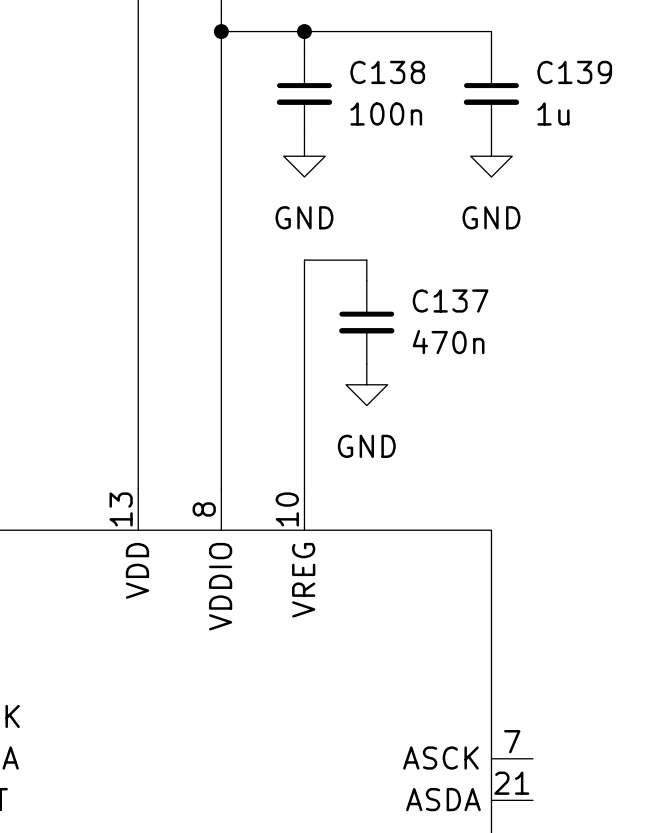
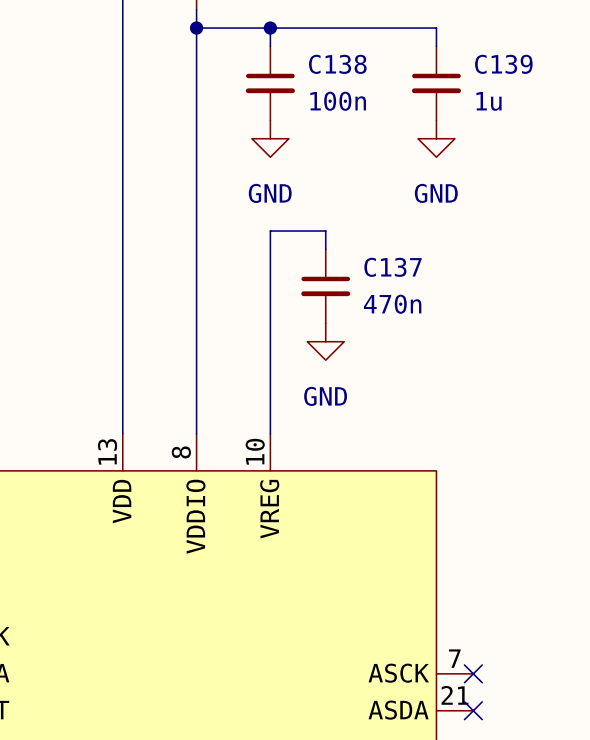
no-connect mark: none -> (473, 673)
no-connect mark: none -> (473, 710)

